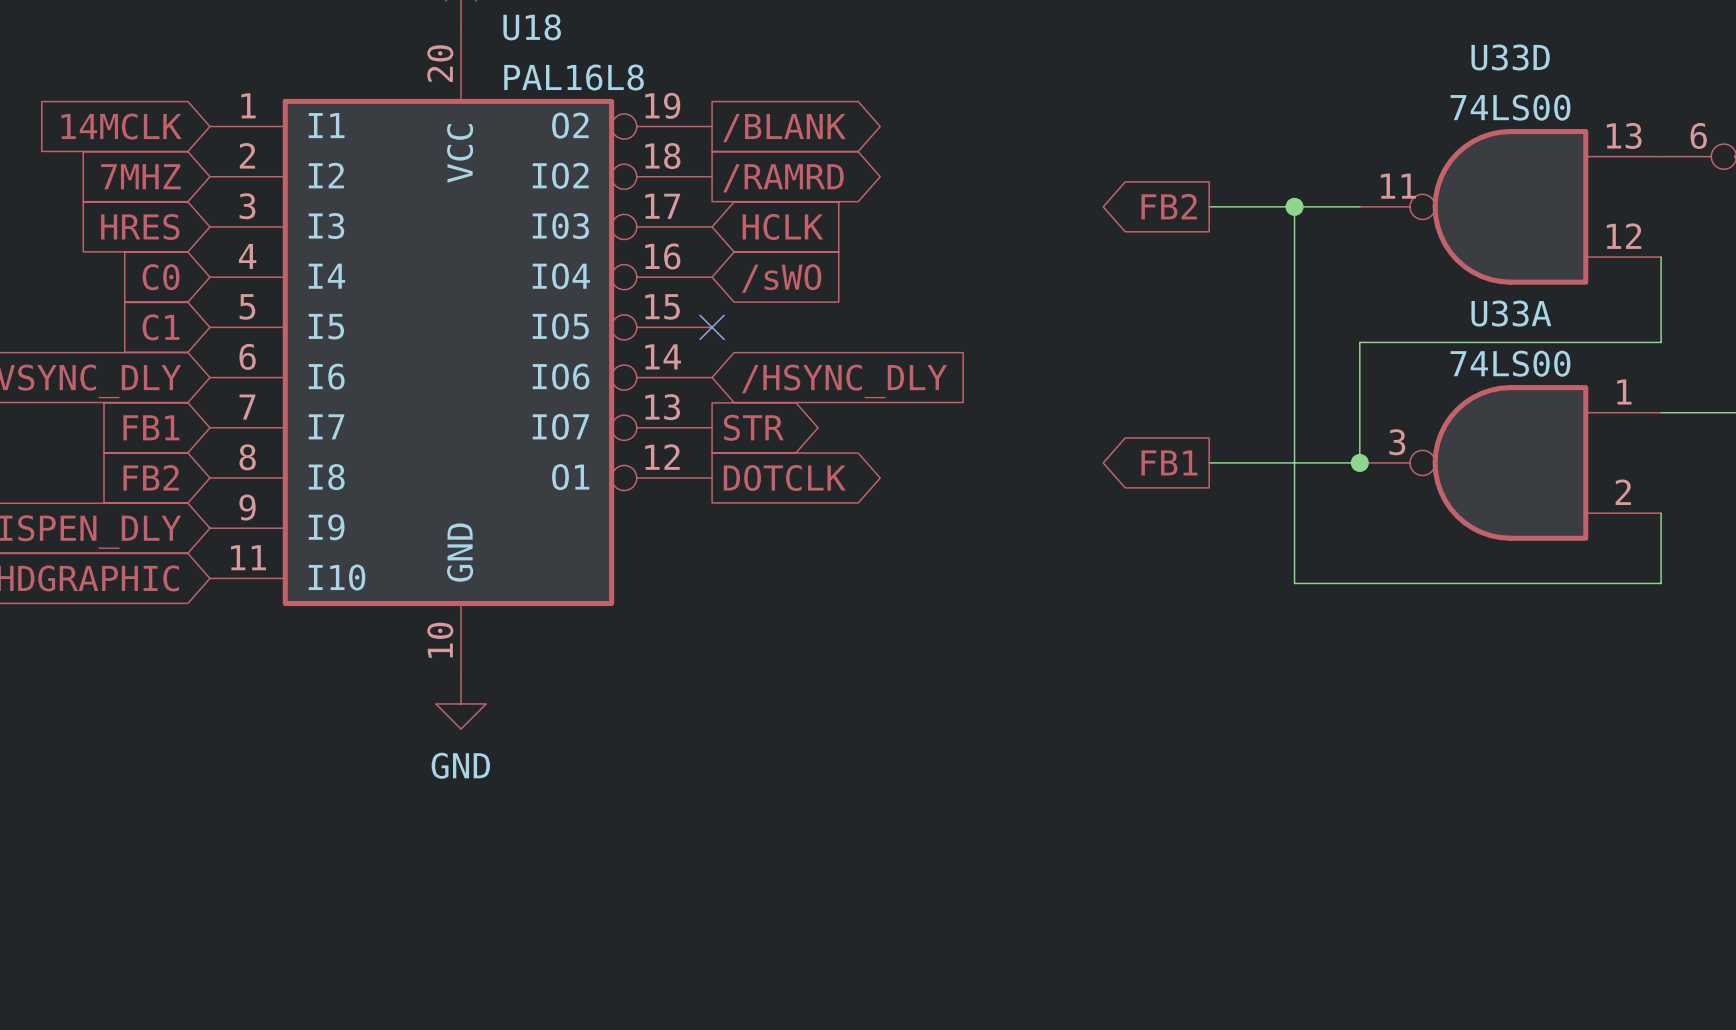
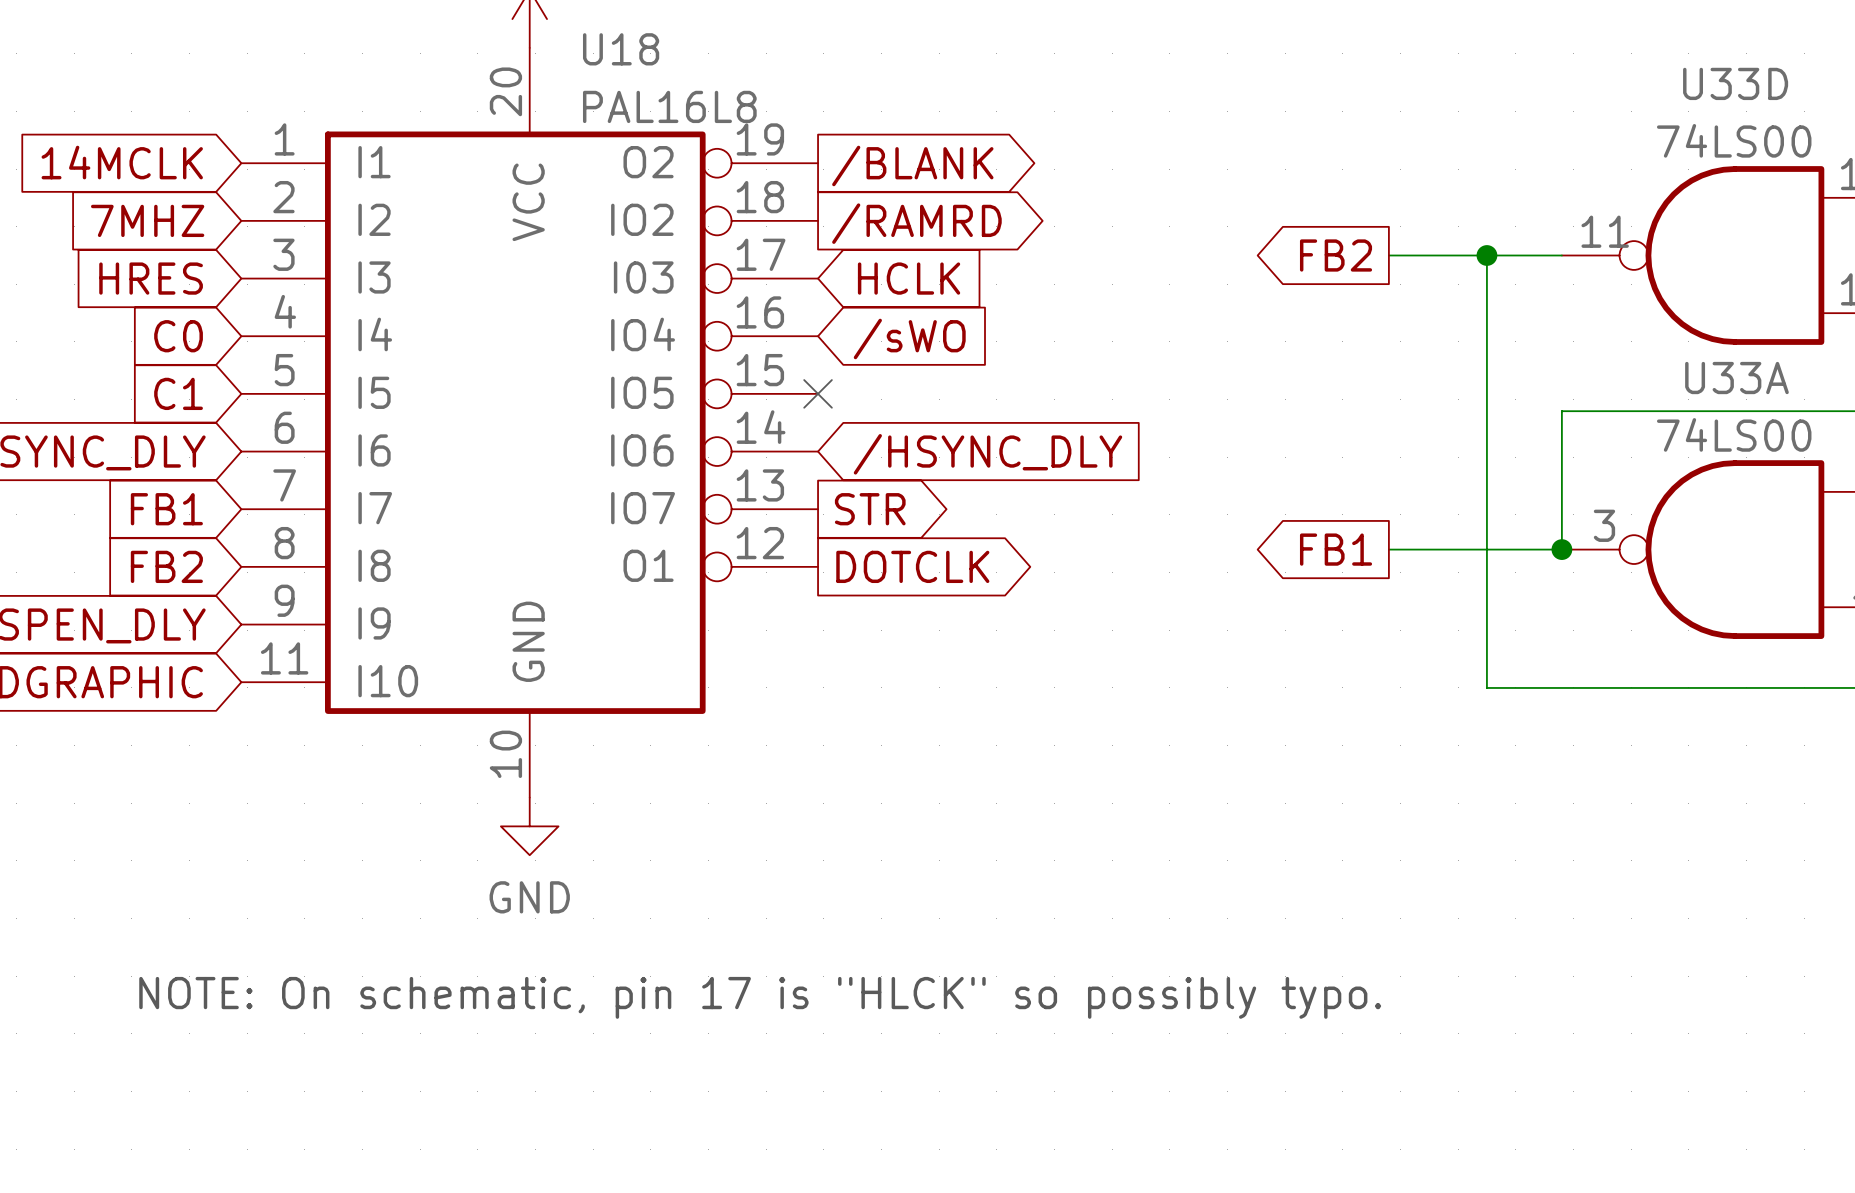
text: none -> NOTE: On schematic, pin 17 is "HLCK" so possibly typo. (760, 997)

